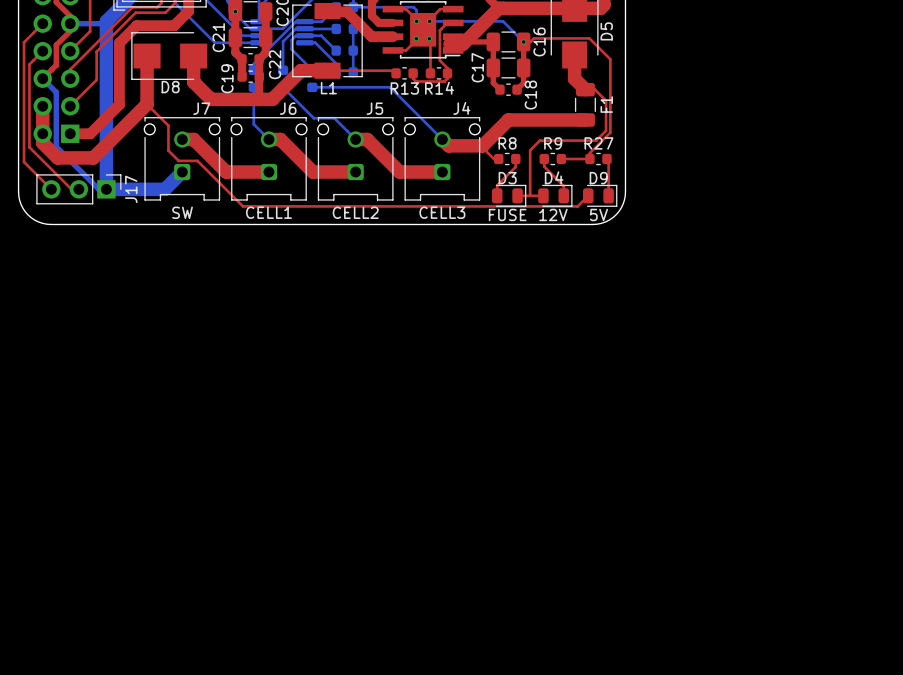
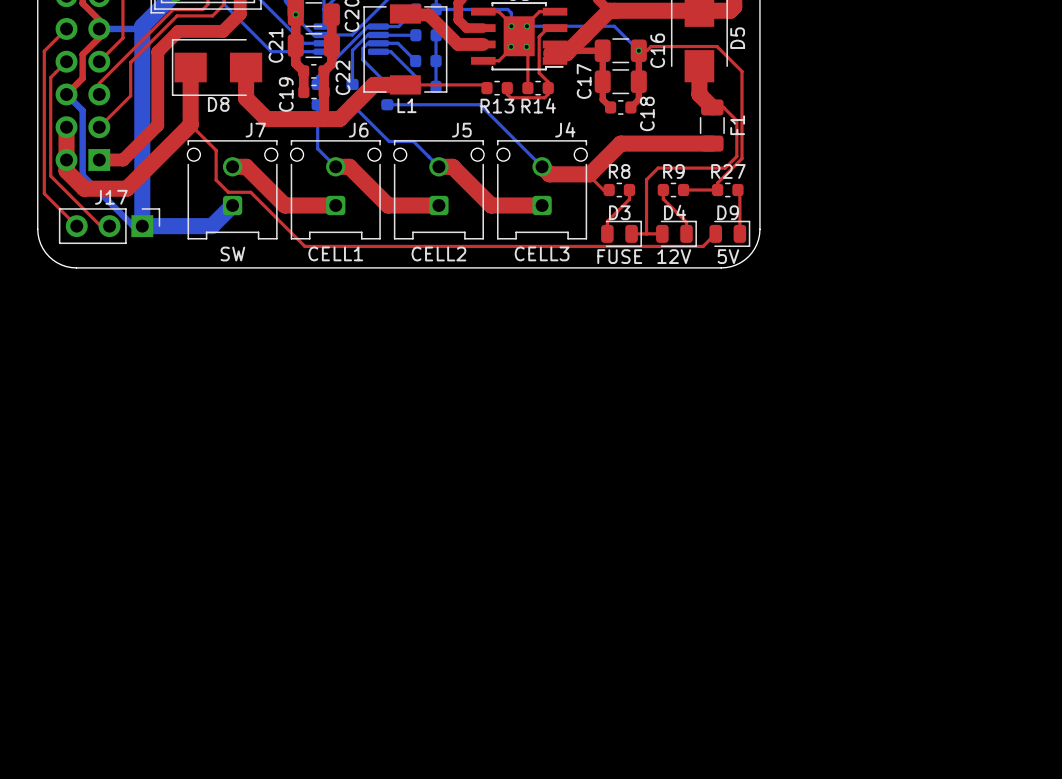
J17 name rotation: 0° (131, 189) -> 90° clockwise (111, 197)
J17 name position: J17 (131, 189) -> J17 (111, 197)

